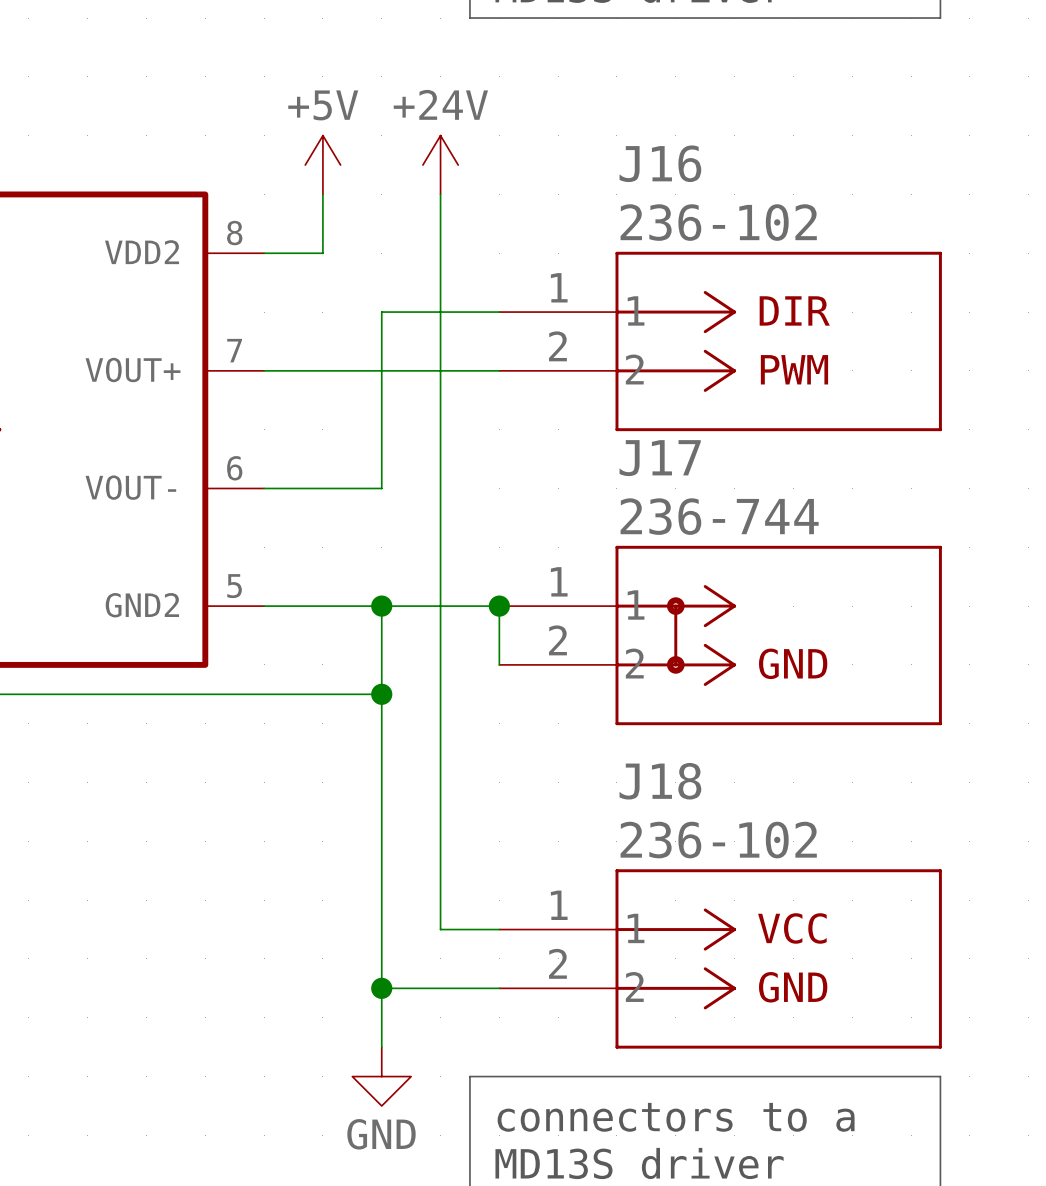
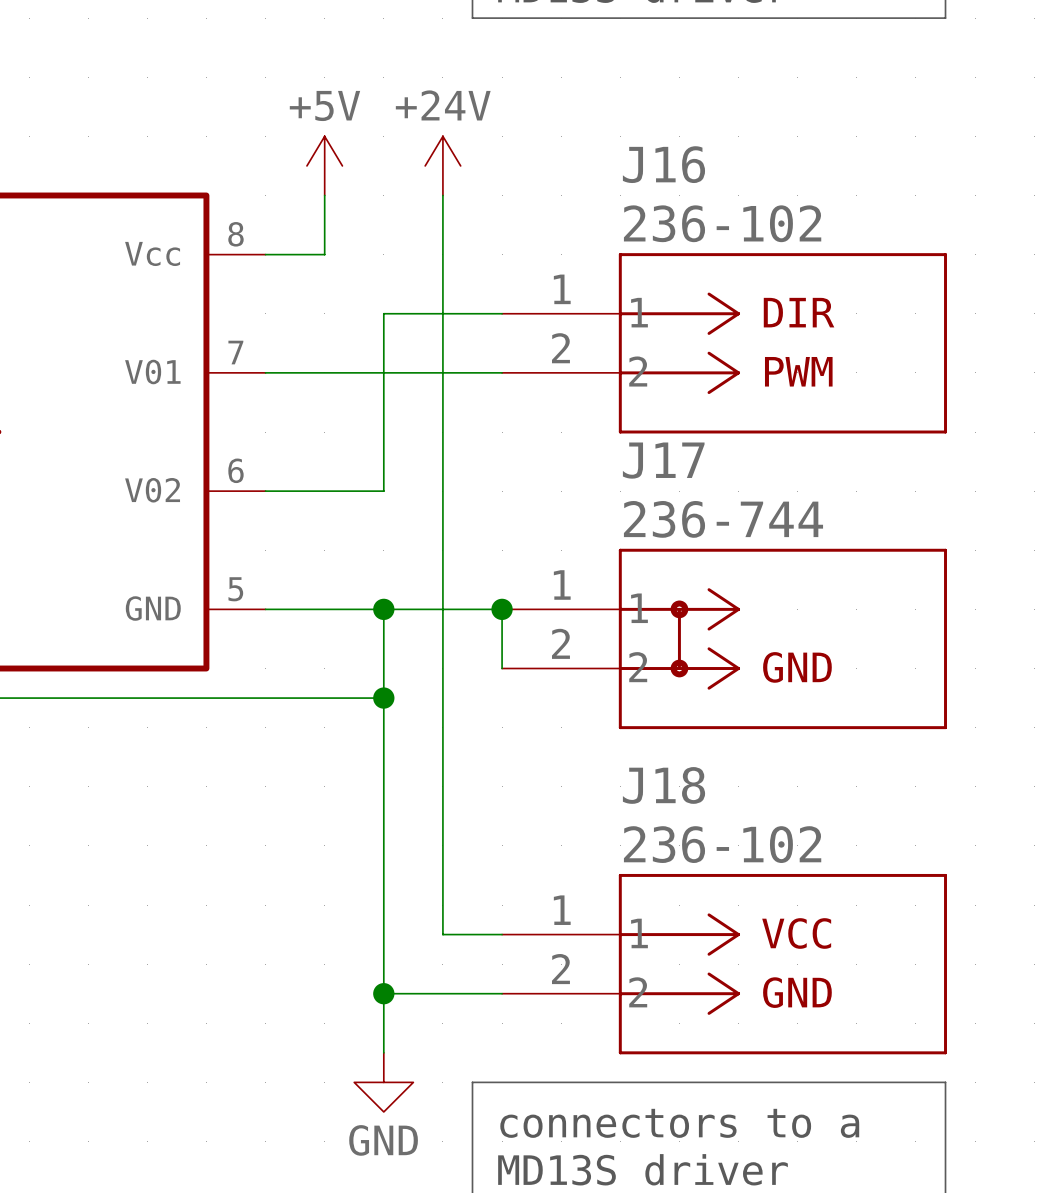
part pin name: VDD2 (142, 252) -> Vcc (152, 253)
part pin name: VOUT+ (132, 370) -> V01 (152, 372)
part pin name: VOUT- (130, 487) -> V02 (152, 490)
part pin name: GND2 (142, 605) -> GND (153, 608)

